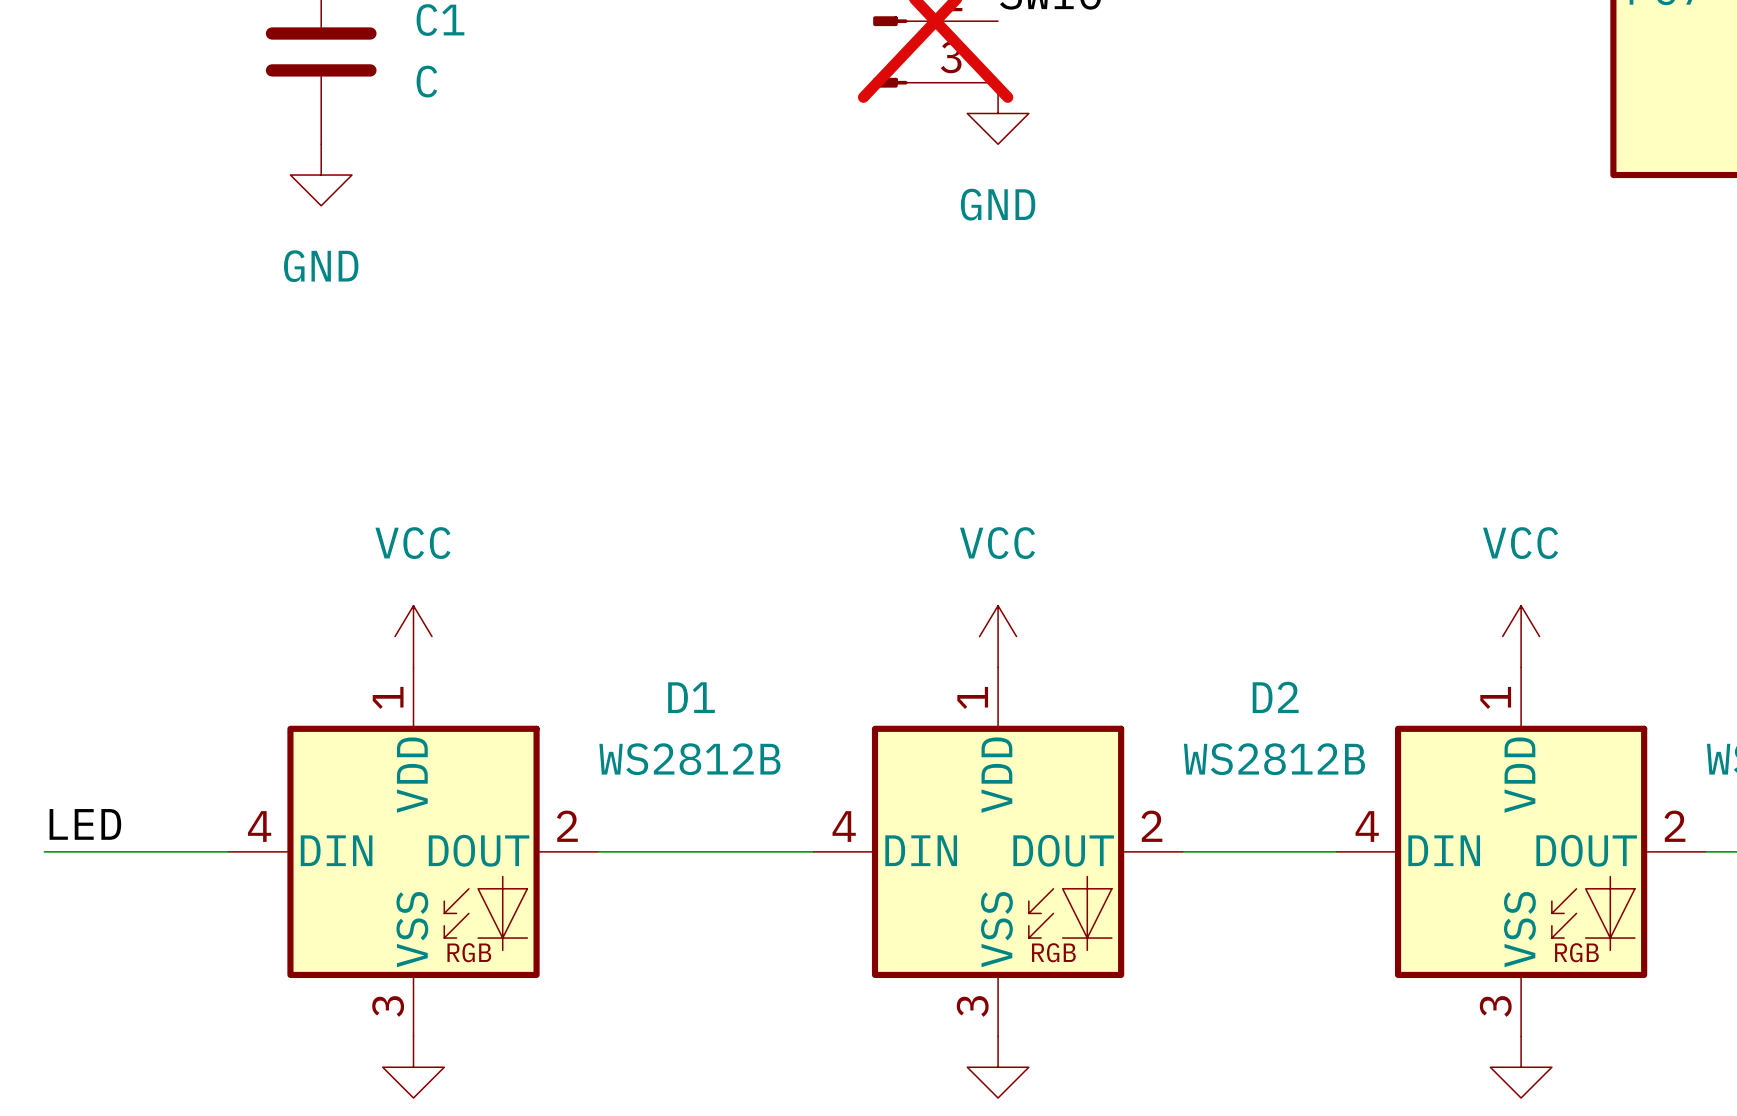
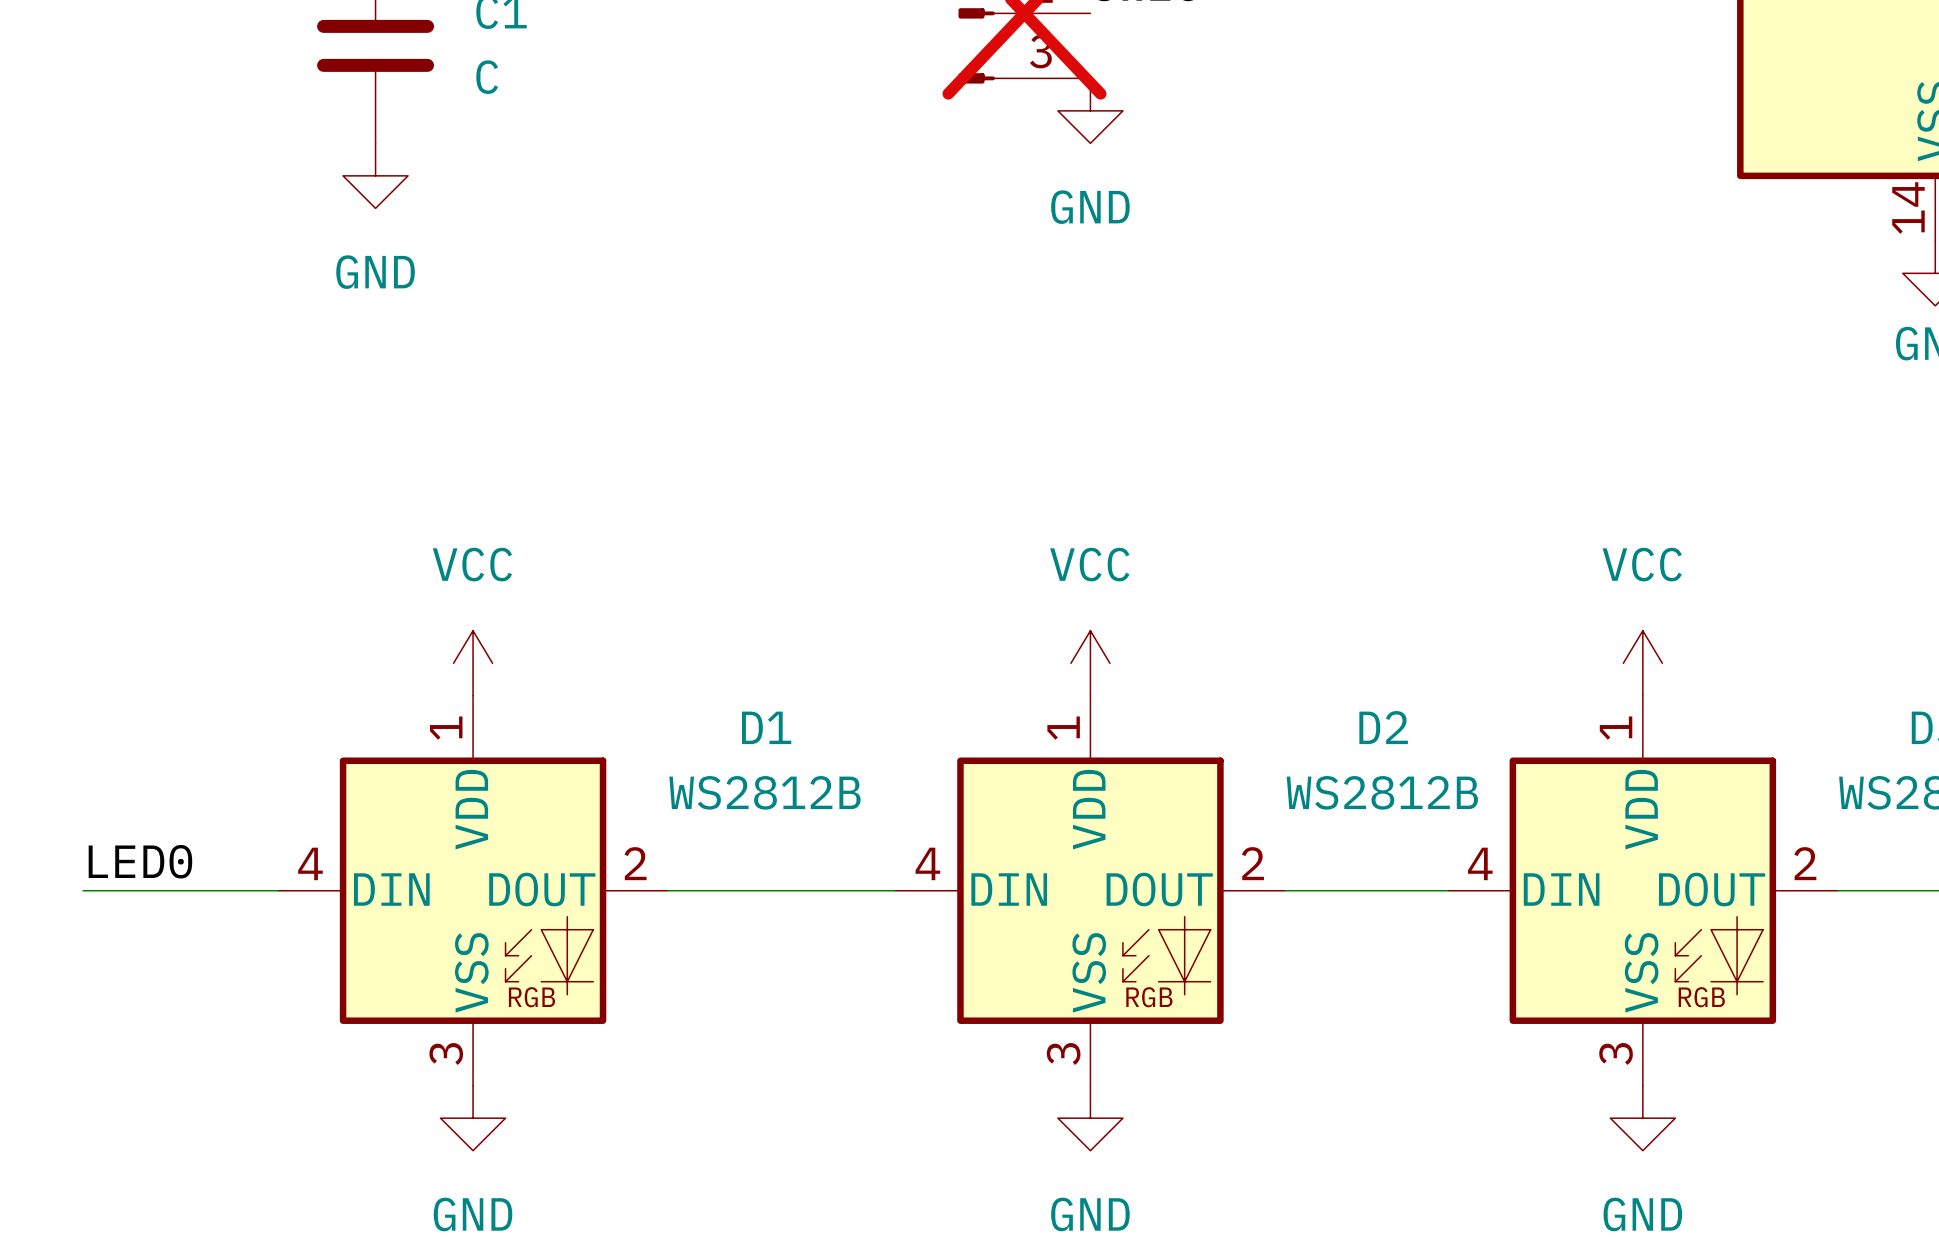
label: LED (85, 824) -> LED0 (140, 861)

